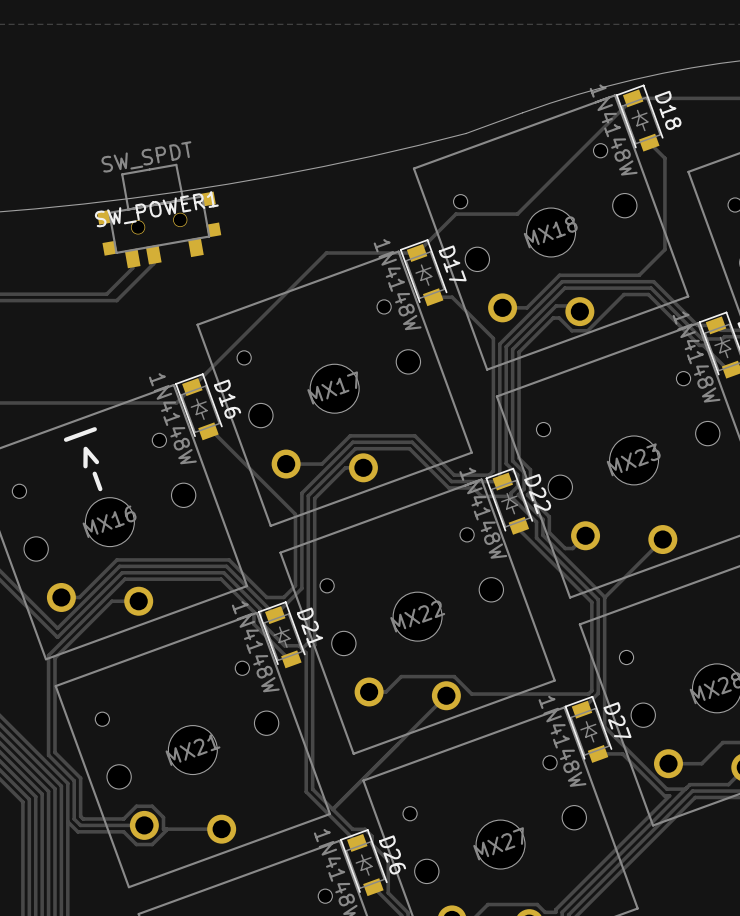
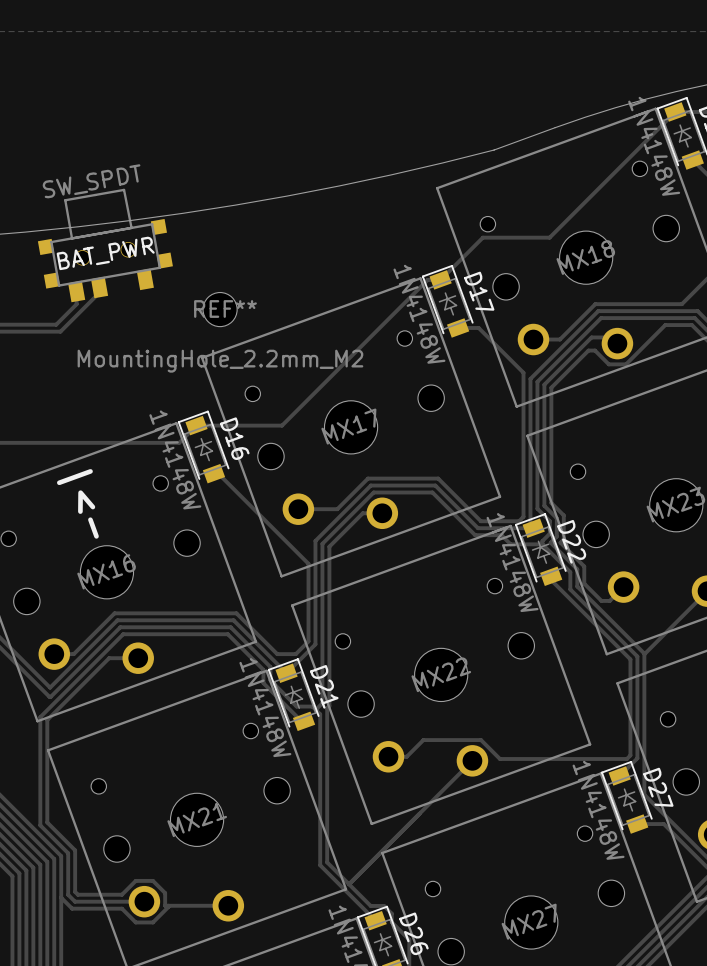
SW_POWER1: SW_SPDT (159, 216) -> none
BAT_PWR: none -> SW_SPDT (105, 245)
track: (405, 252) (326, 252) (192, 387) -> (427, 279) (282, 425) (196, 425)
track: (153, 254) (153, 263) (116, 300) (67, 300) -> (99, 287) (99, 292) (60, 331)
track: (132, 258) (132, 268) (106, 294) (63, 294) -> (76, 291) (76, 304) (56, 324)
REF**: none -> MountingHole_2.2mm_M2 (220, 309)

